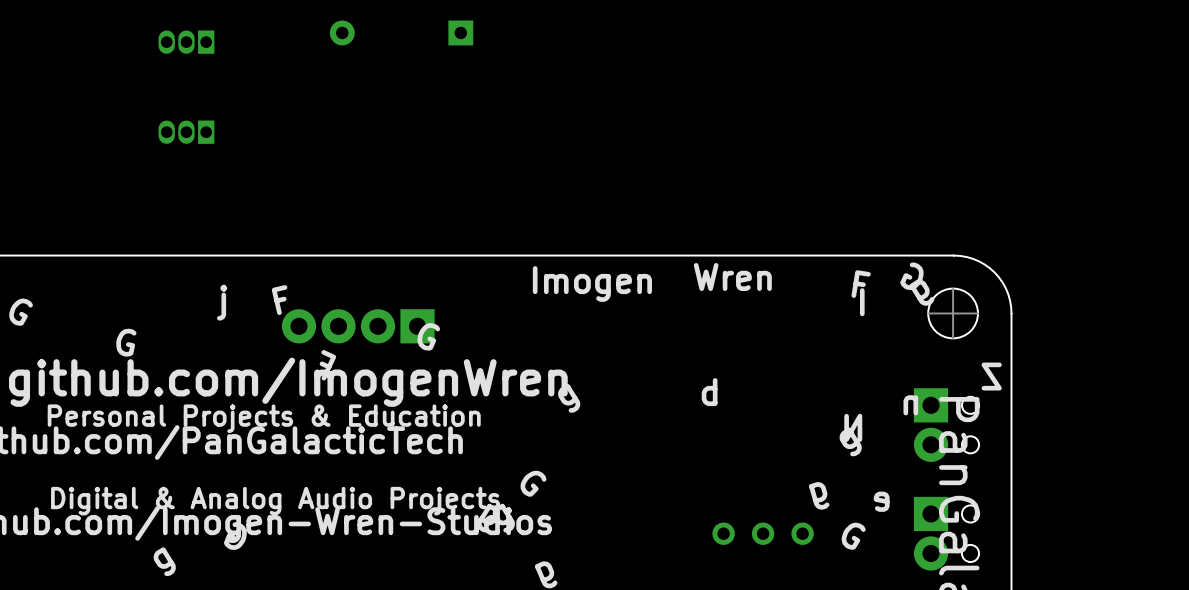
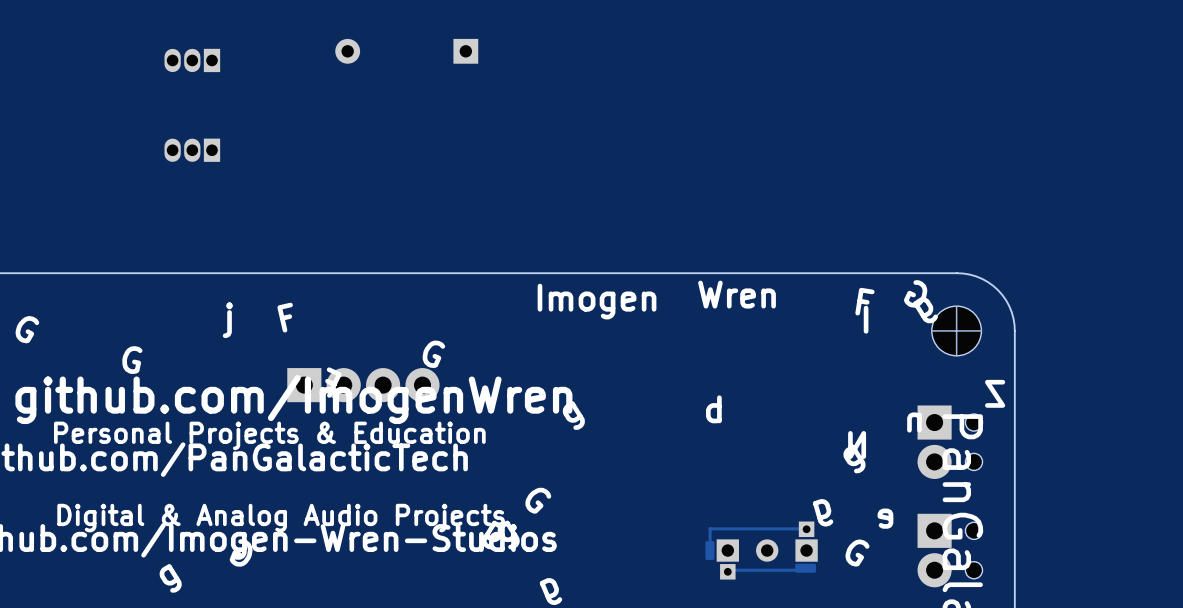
part rotation: 0° (358, 326) -> 180° (363, 385)
part footprint: [712, 522, 814, 545] -> [705, 521, 818, 580]

